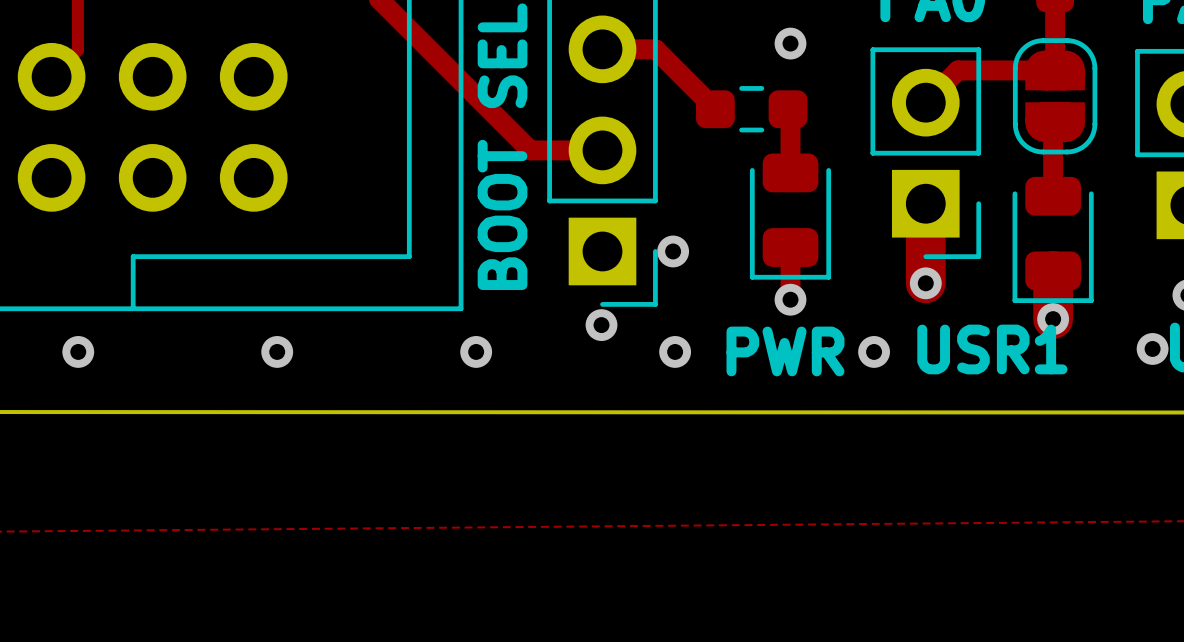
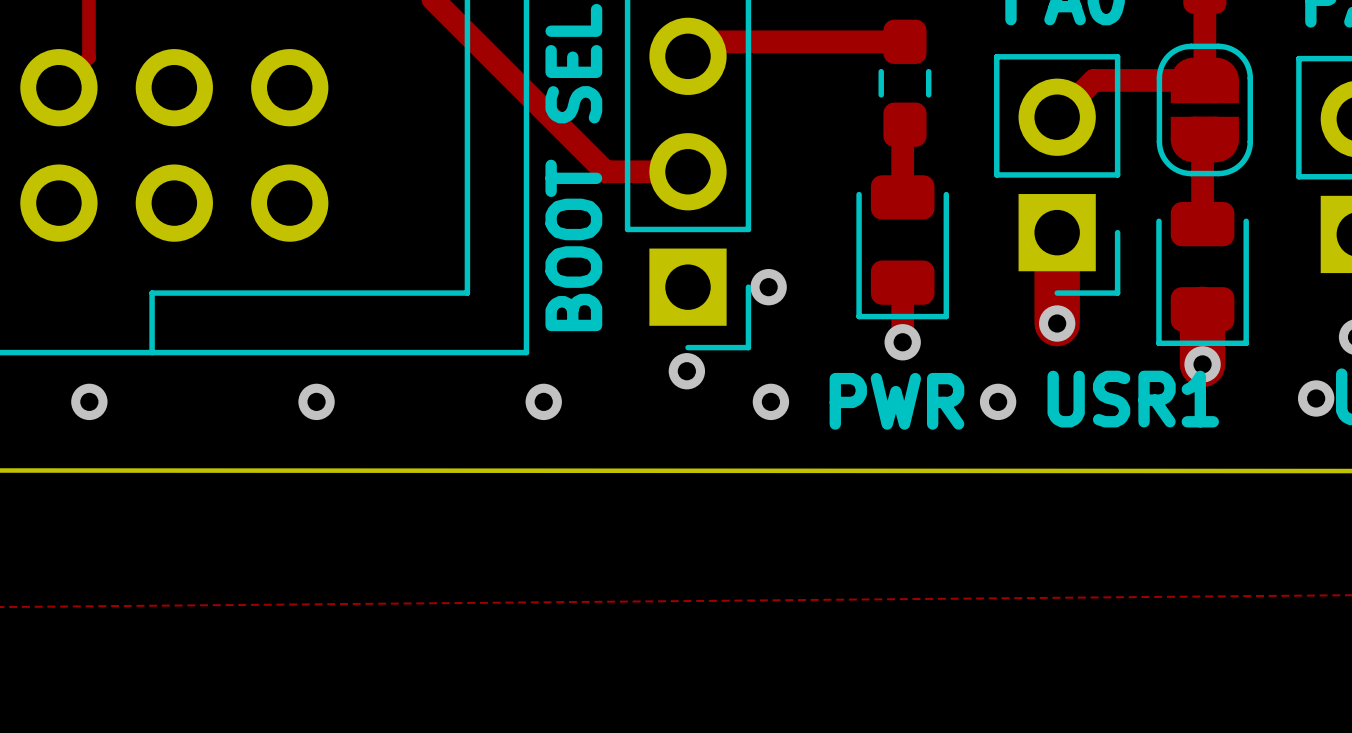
via: (790, 43) -> none
track: (602, 49) (655, 49) (715, 109) -> (688, 56) (702, 41) (904, 41) (910, 46)
part rotation: 0° (751, 109) -> 90° clockwise (904, 83)

